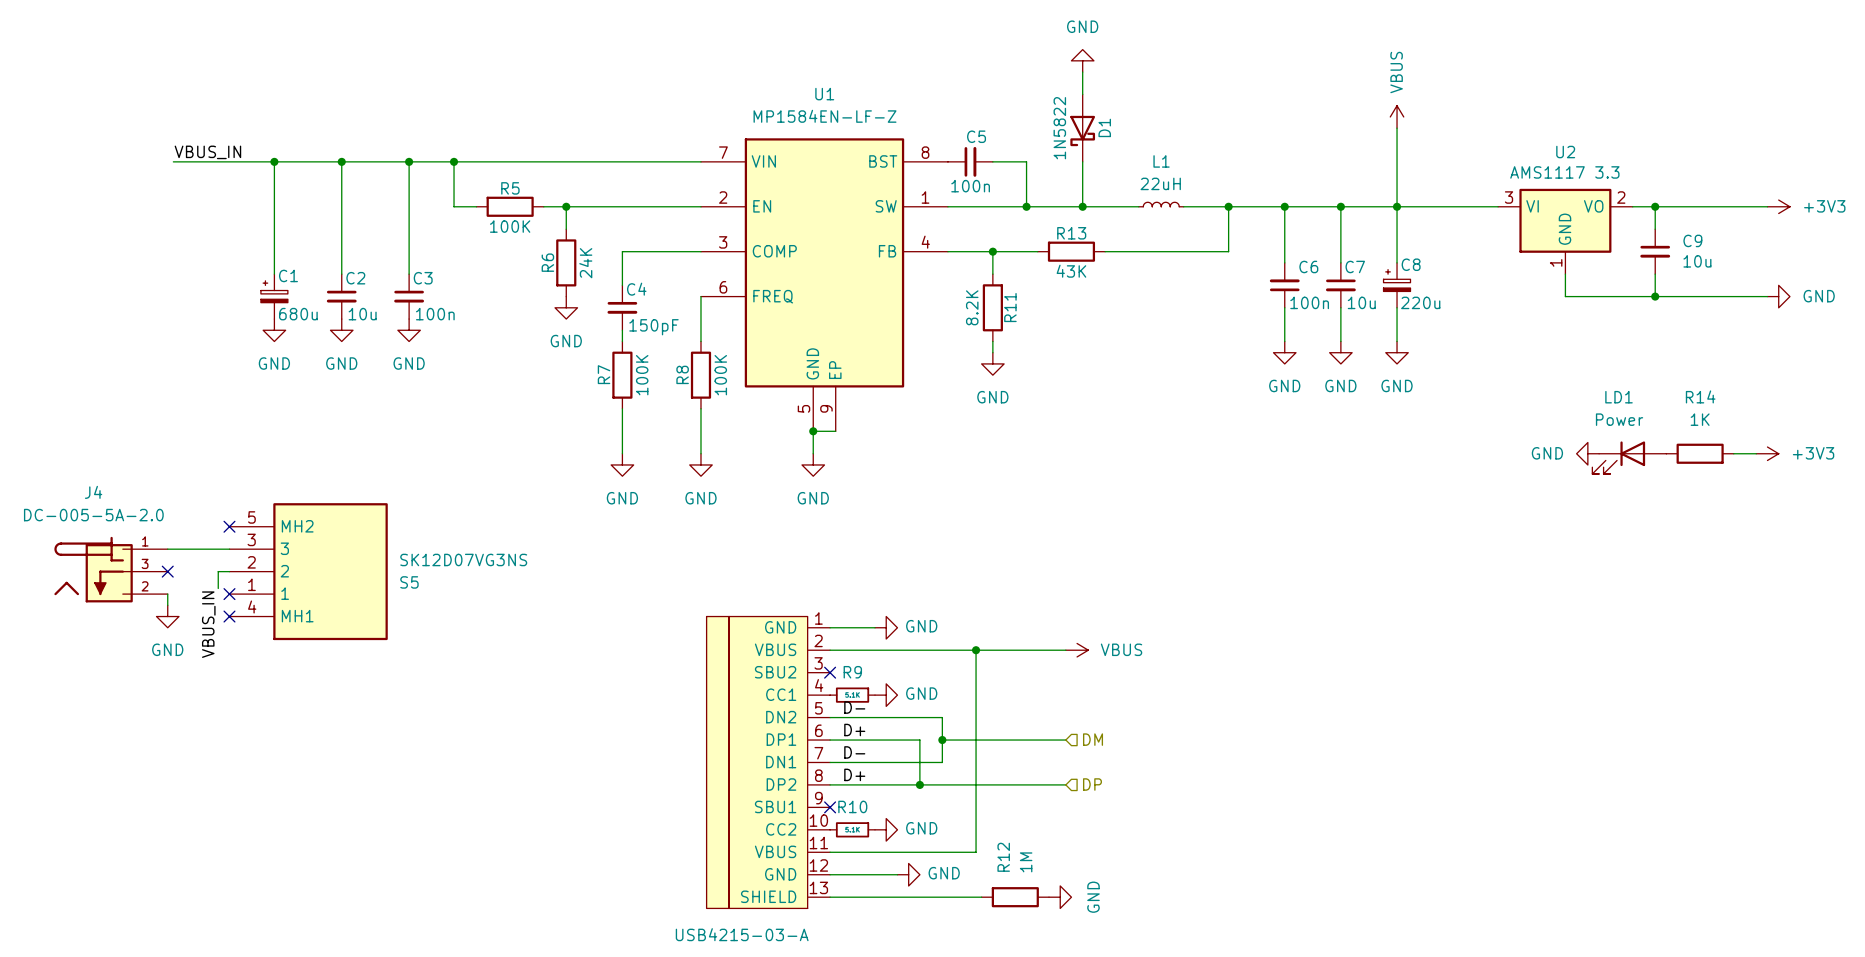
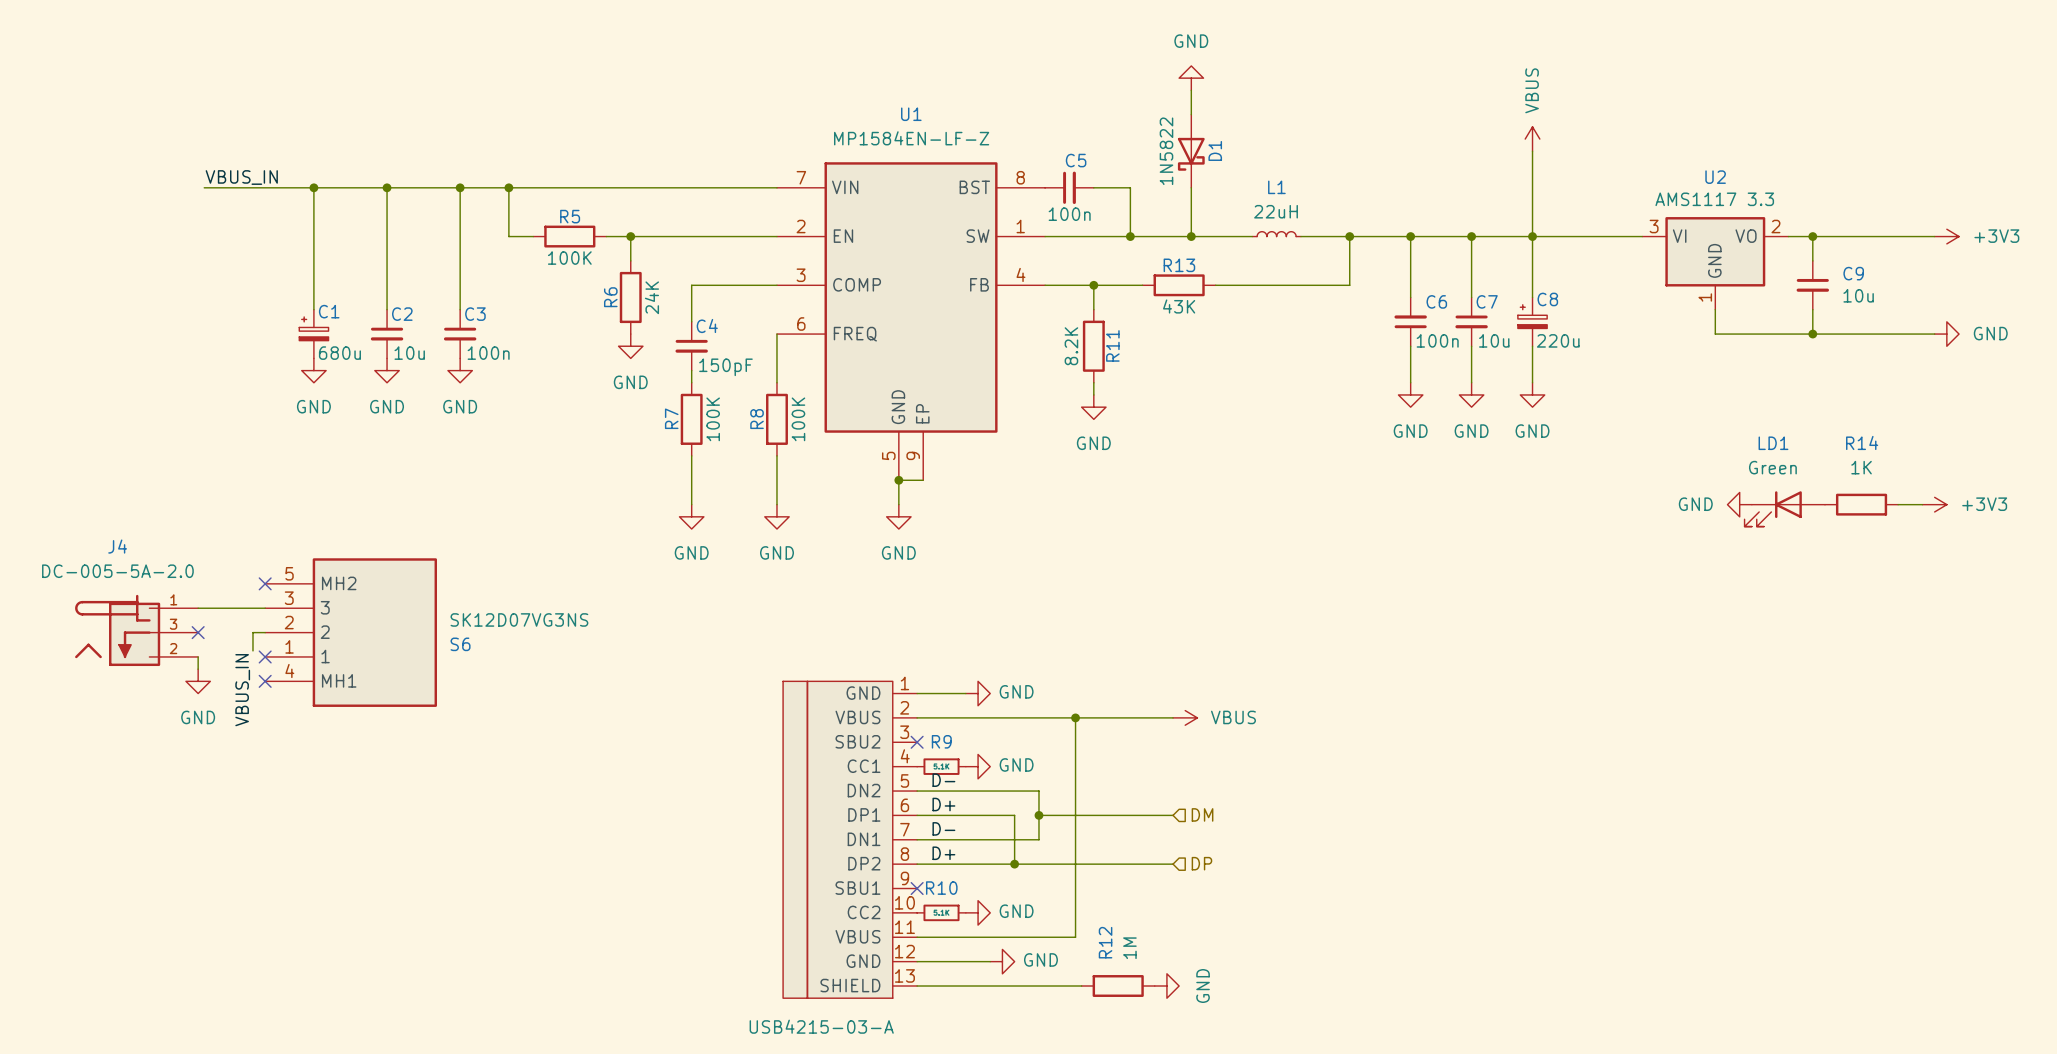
LD1 value: Power (1619, 419) -> Green (1772, 467)
S5 name: S5 (409, 582) -> S6 (460, 644)

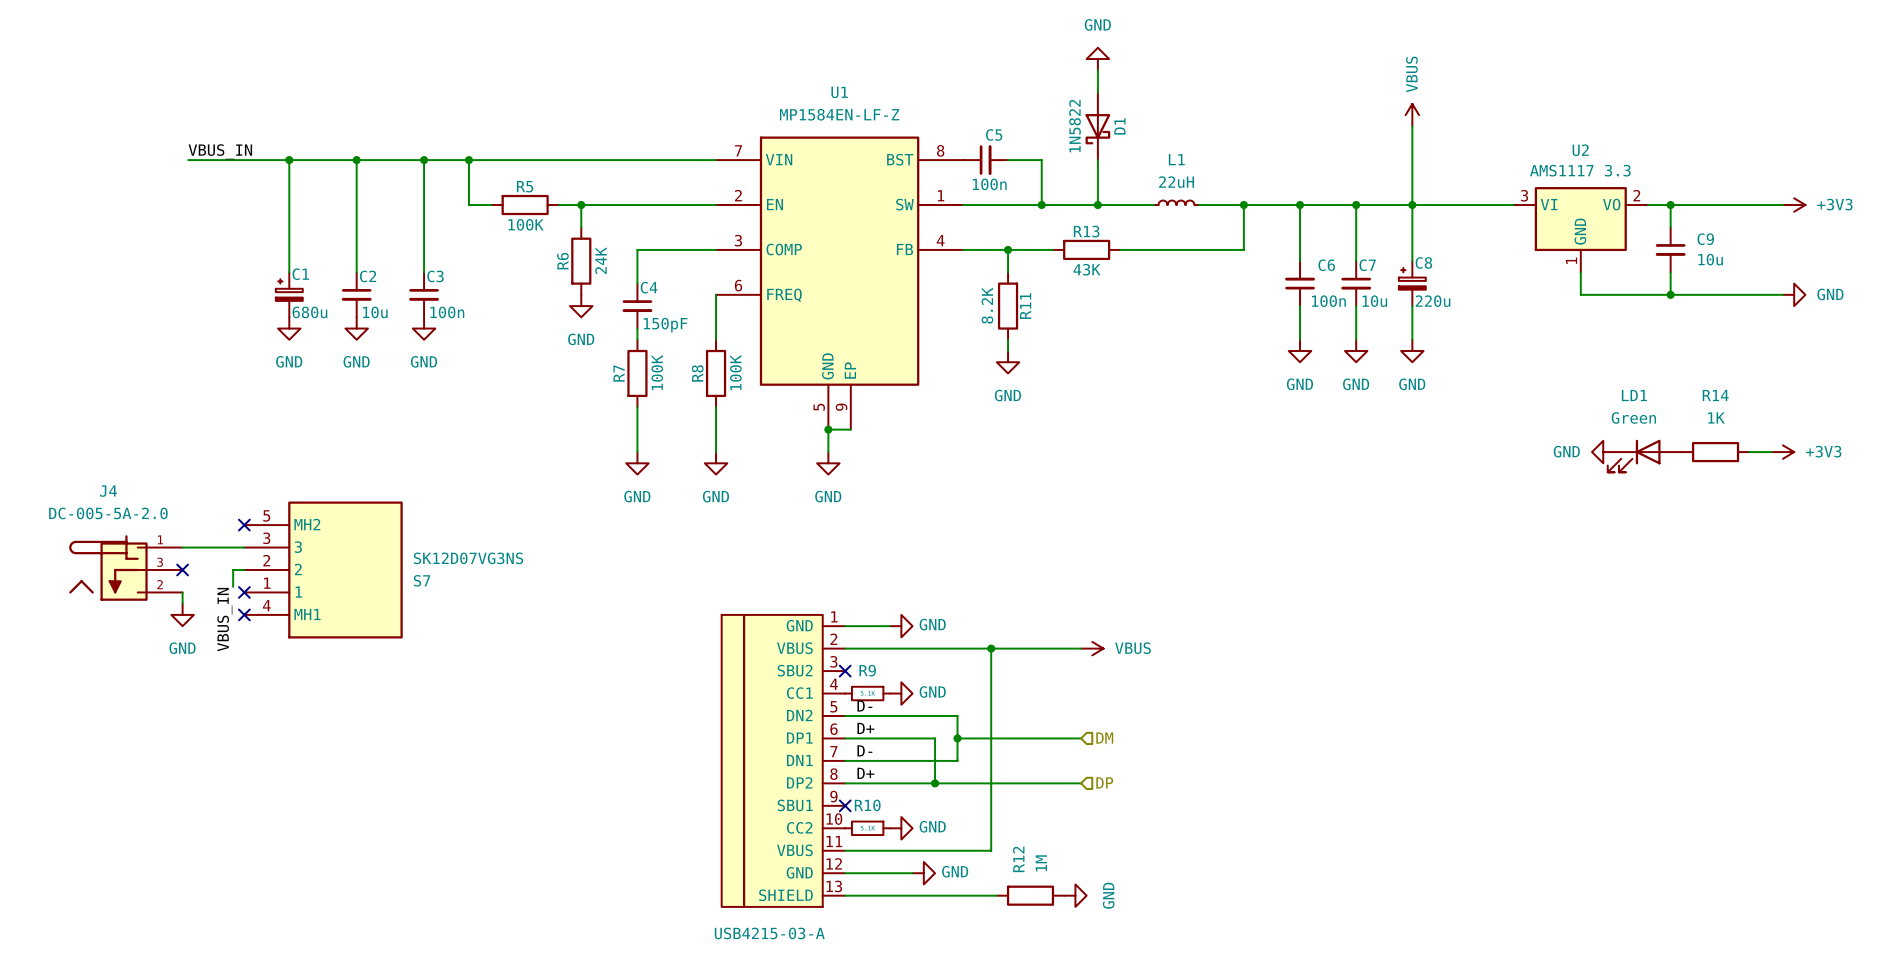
S6 name: S6 (460, 644) -> S7 (422, 580)

